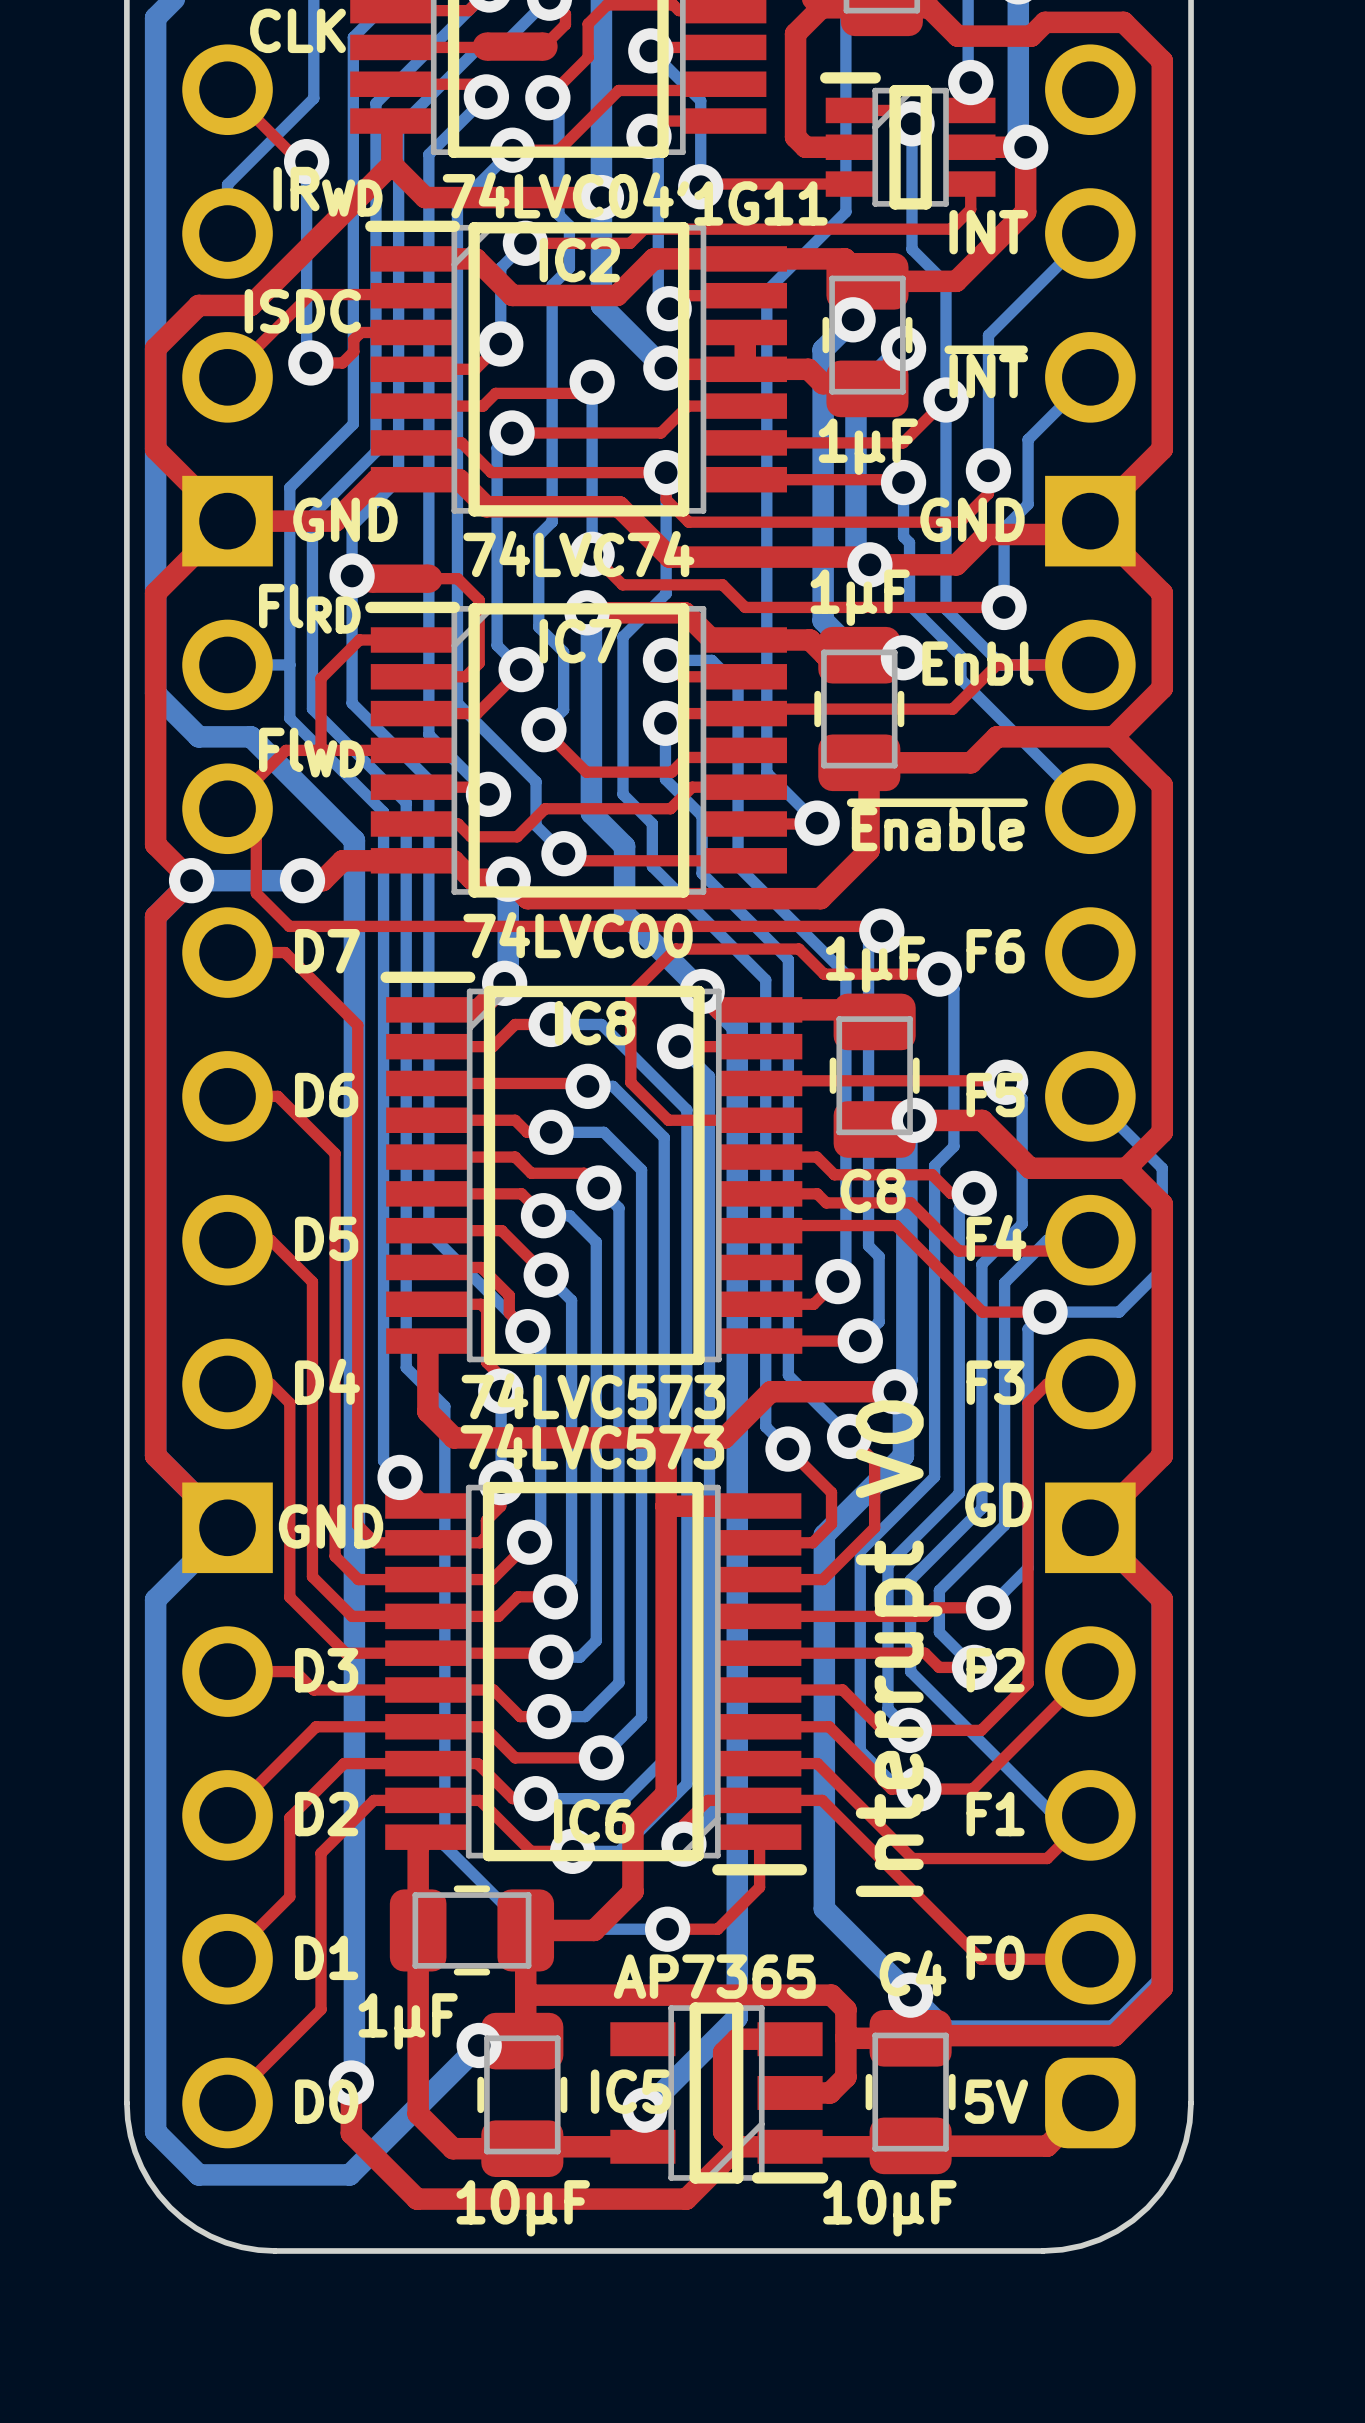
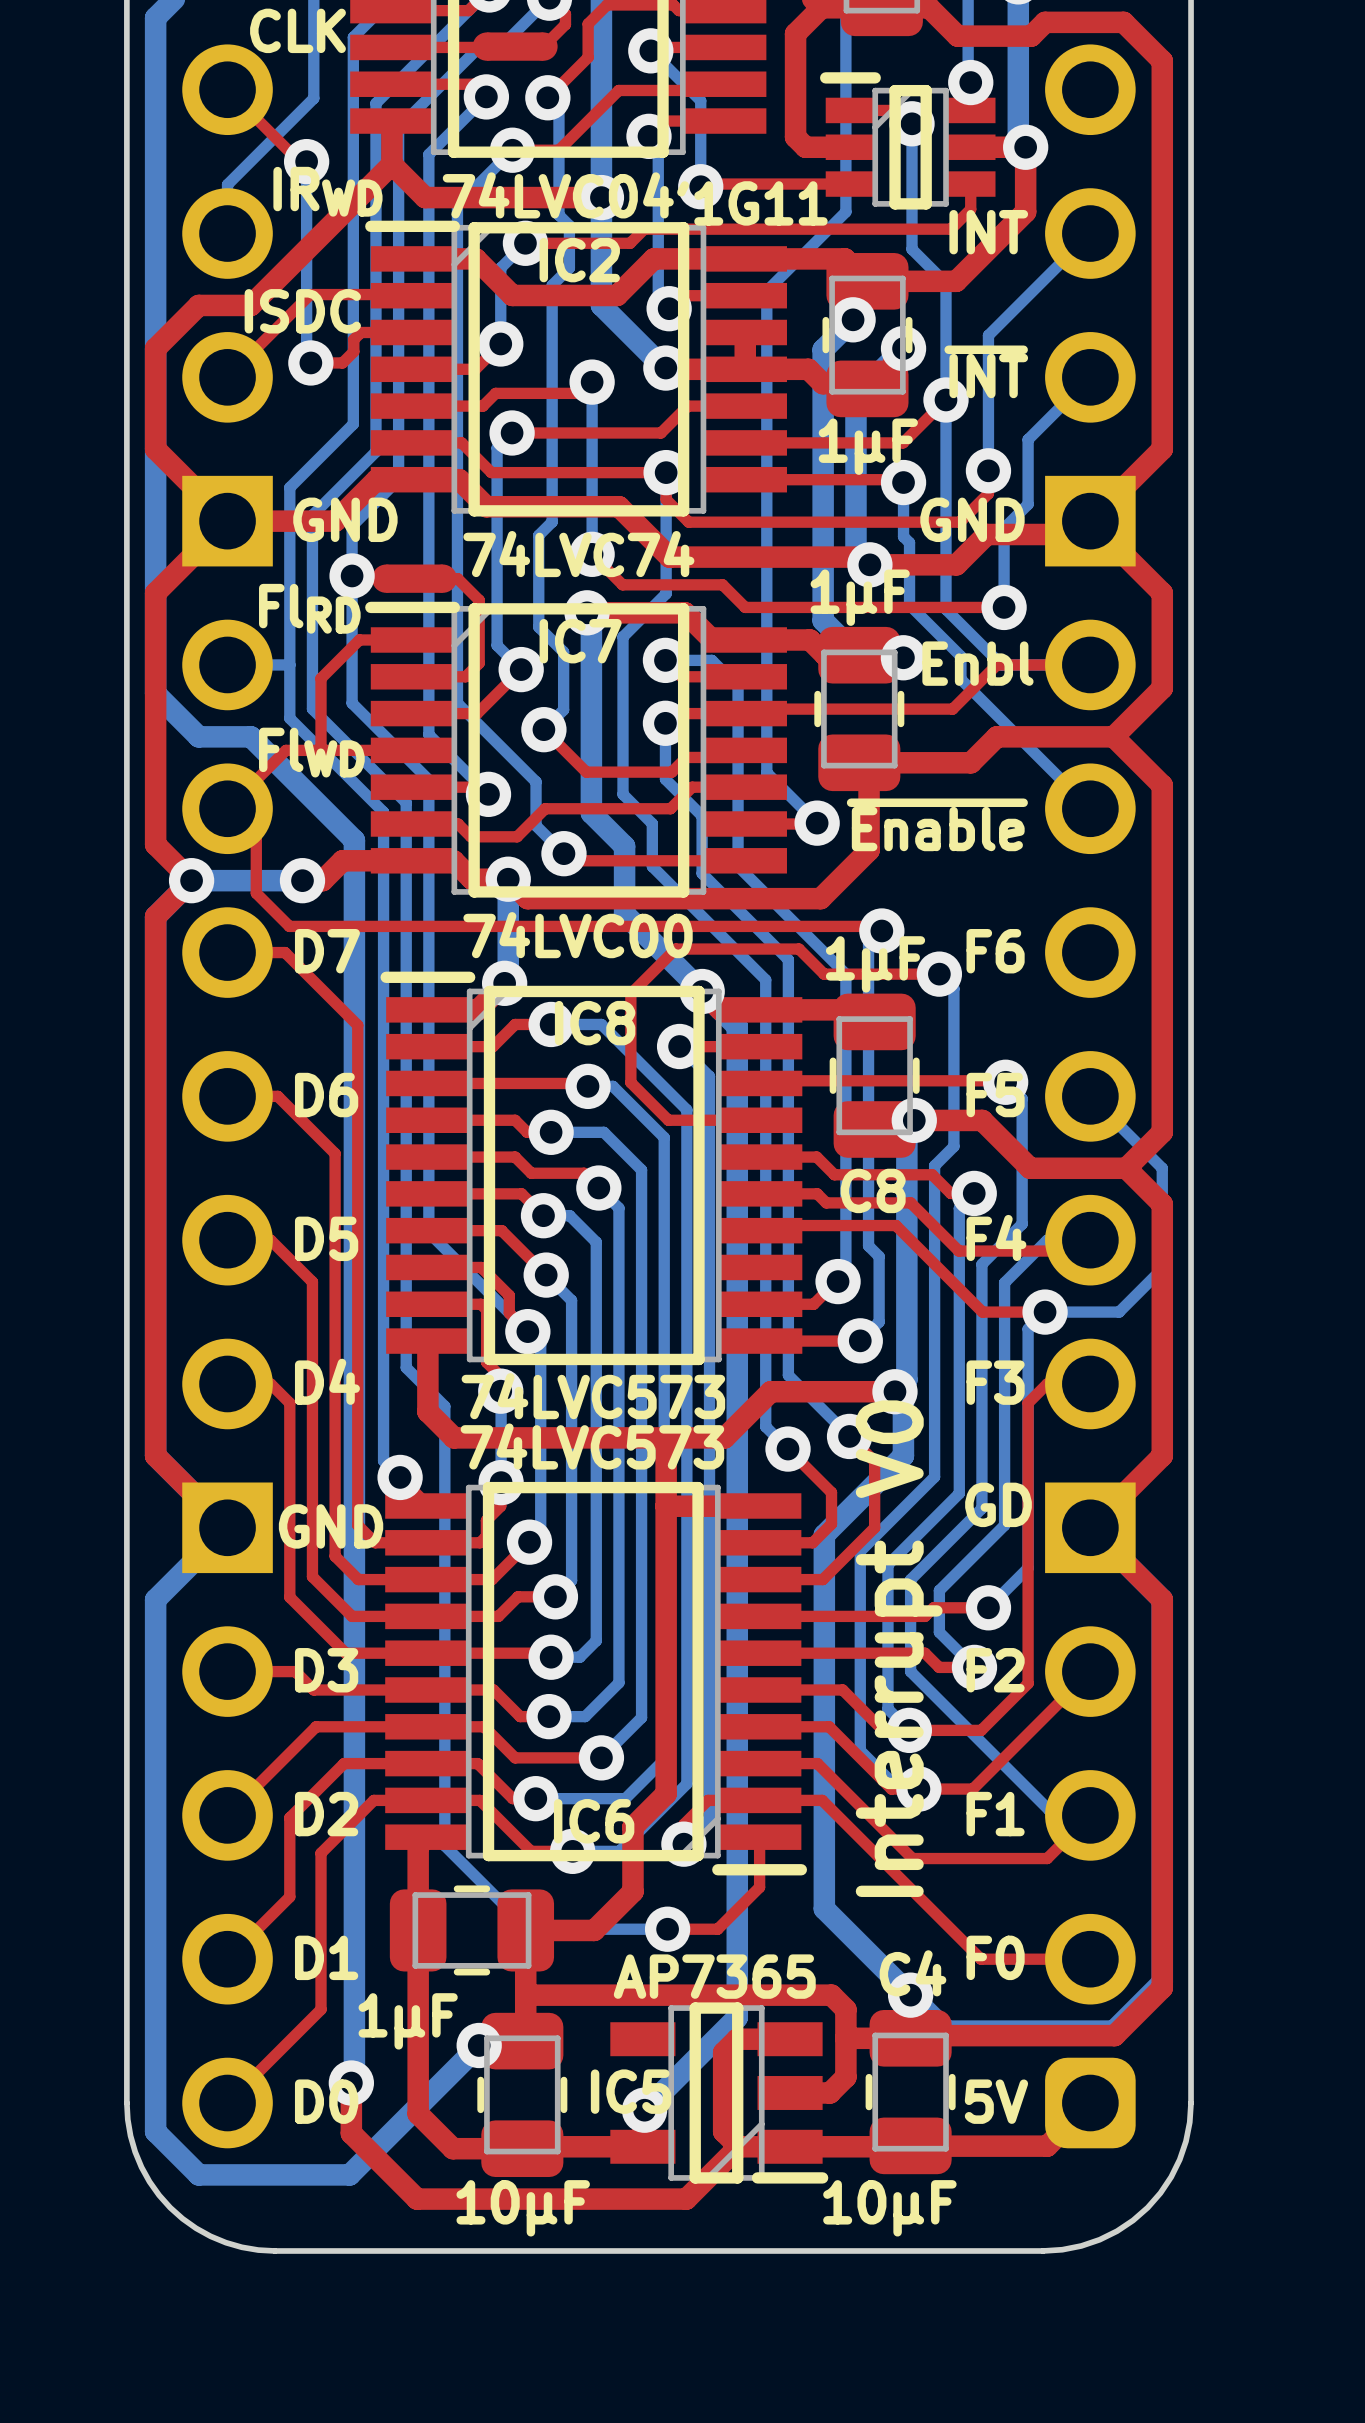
part position: (400, 578) -> (414, 578)

